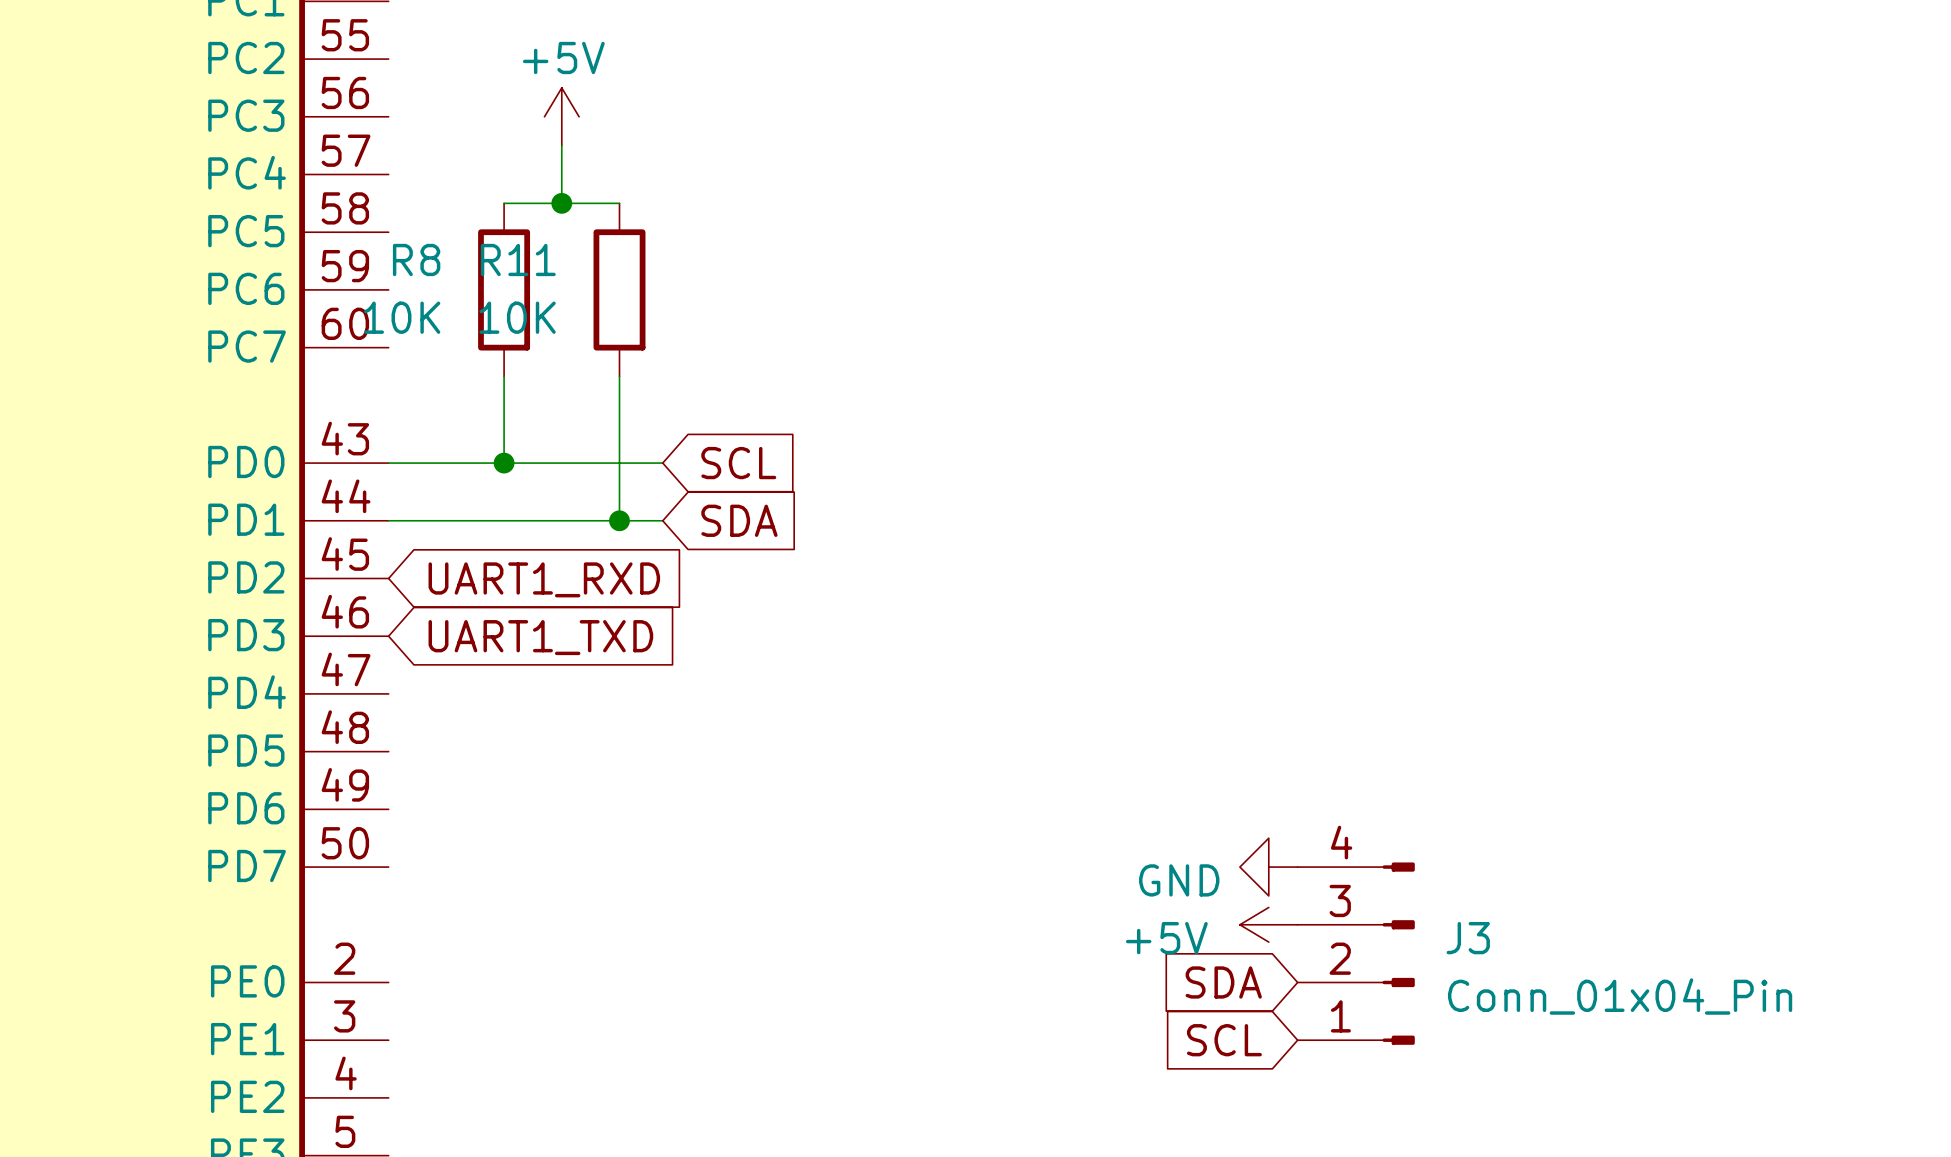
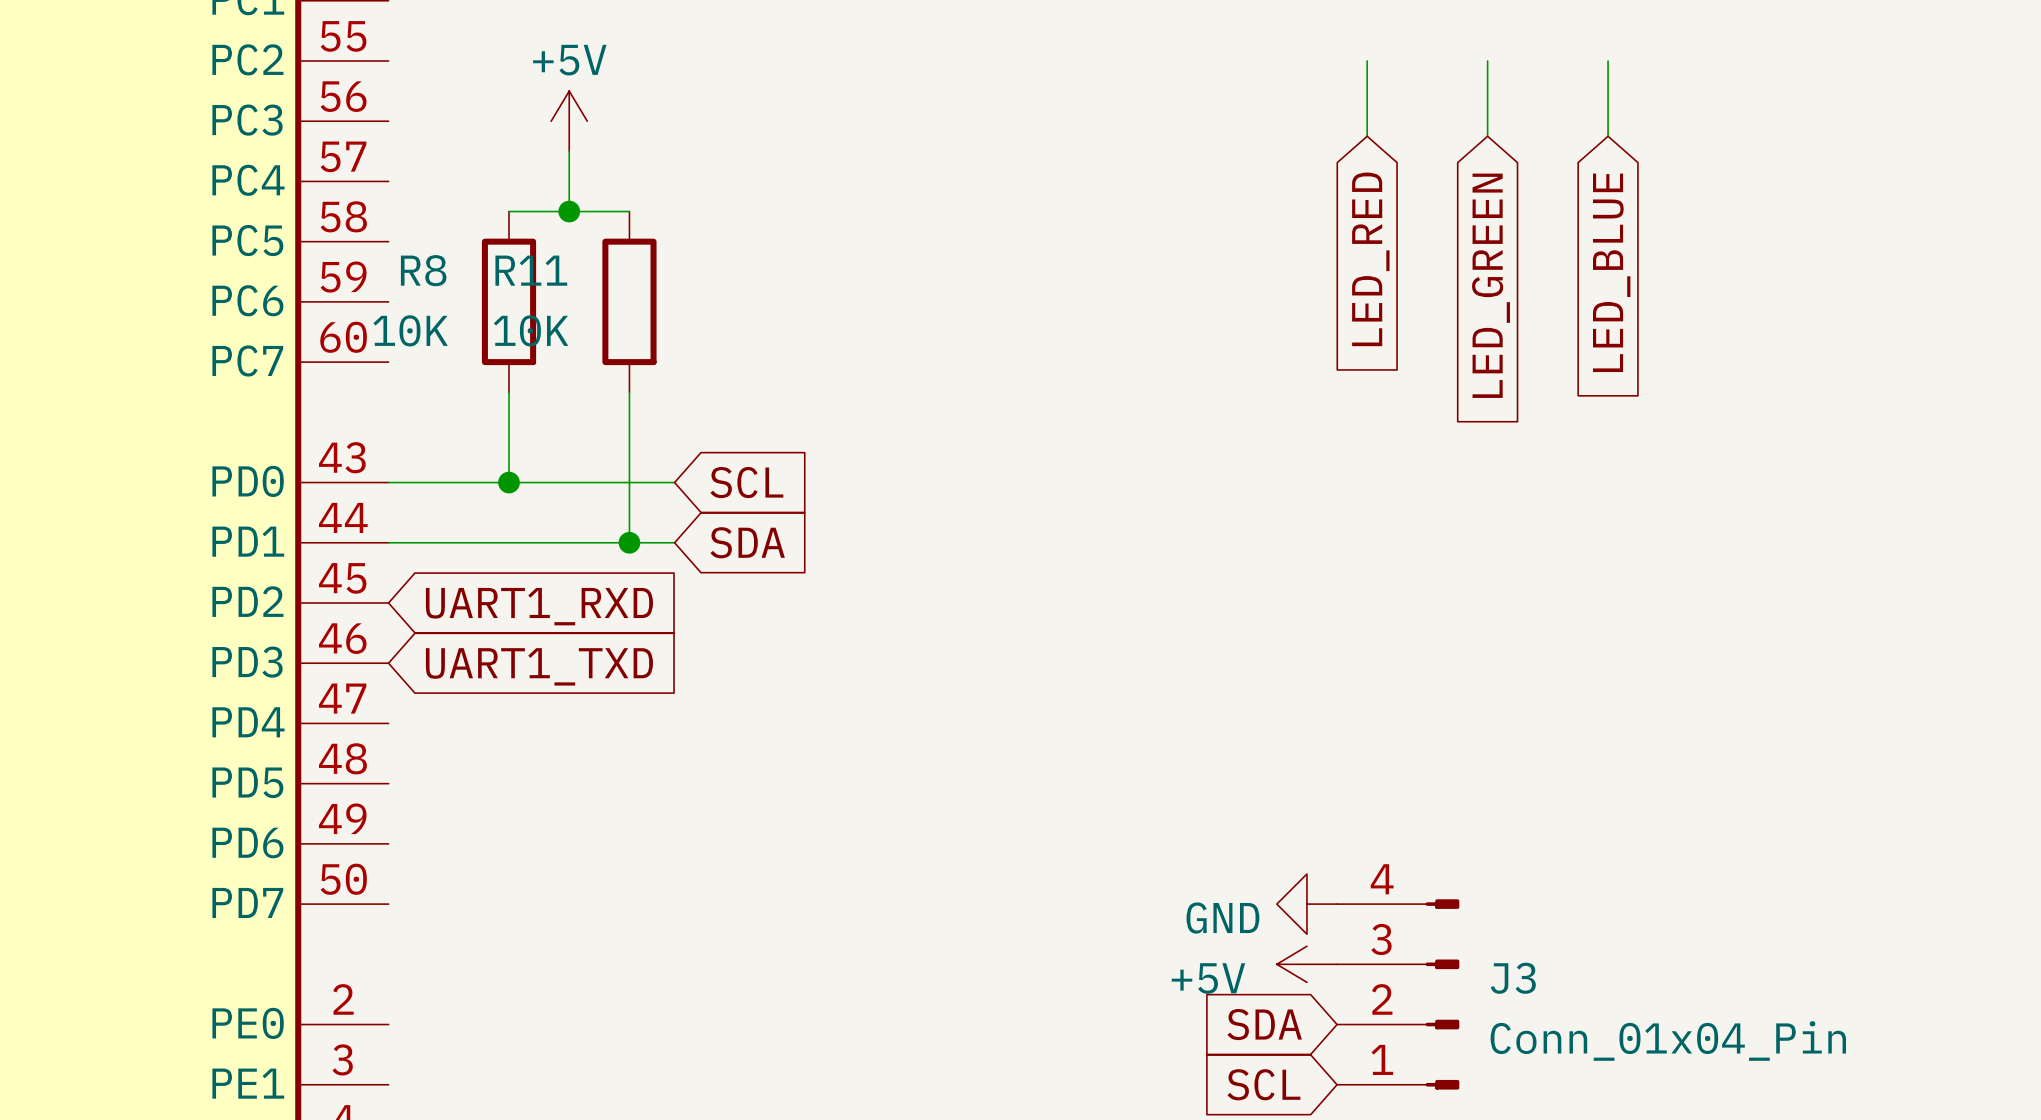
wire: none -> (1367, 60) (1367, 136)
wire: none -> (1487, 60) (1487, 136)
wire: none -> (1608, 60) (1608, 136)
global label: none -> LED_RED (1370, 259)
global label: none -> LED_BLUE (1611, 272)
global label: none -> LED_GREEN (1490, 285)

